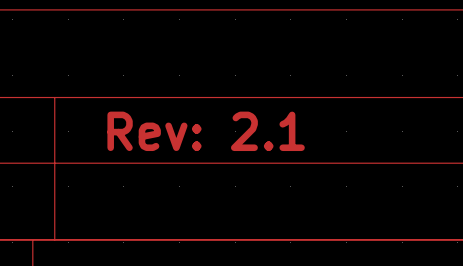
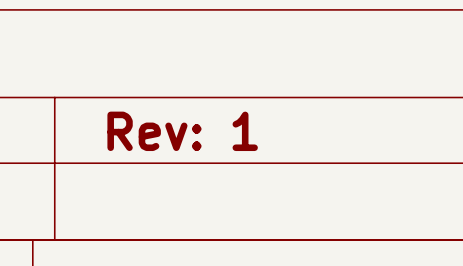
title block: Rev: 2.1 (206, 131) -> Rev: 1 (182, 131)

